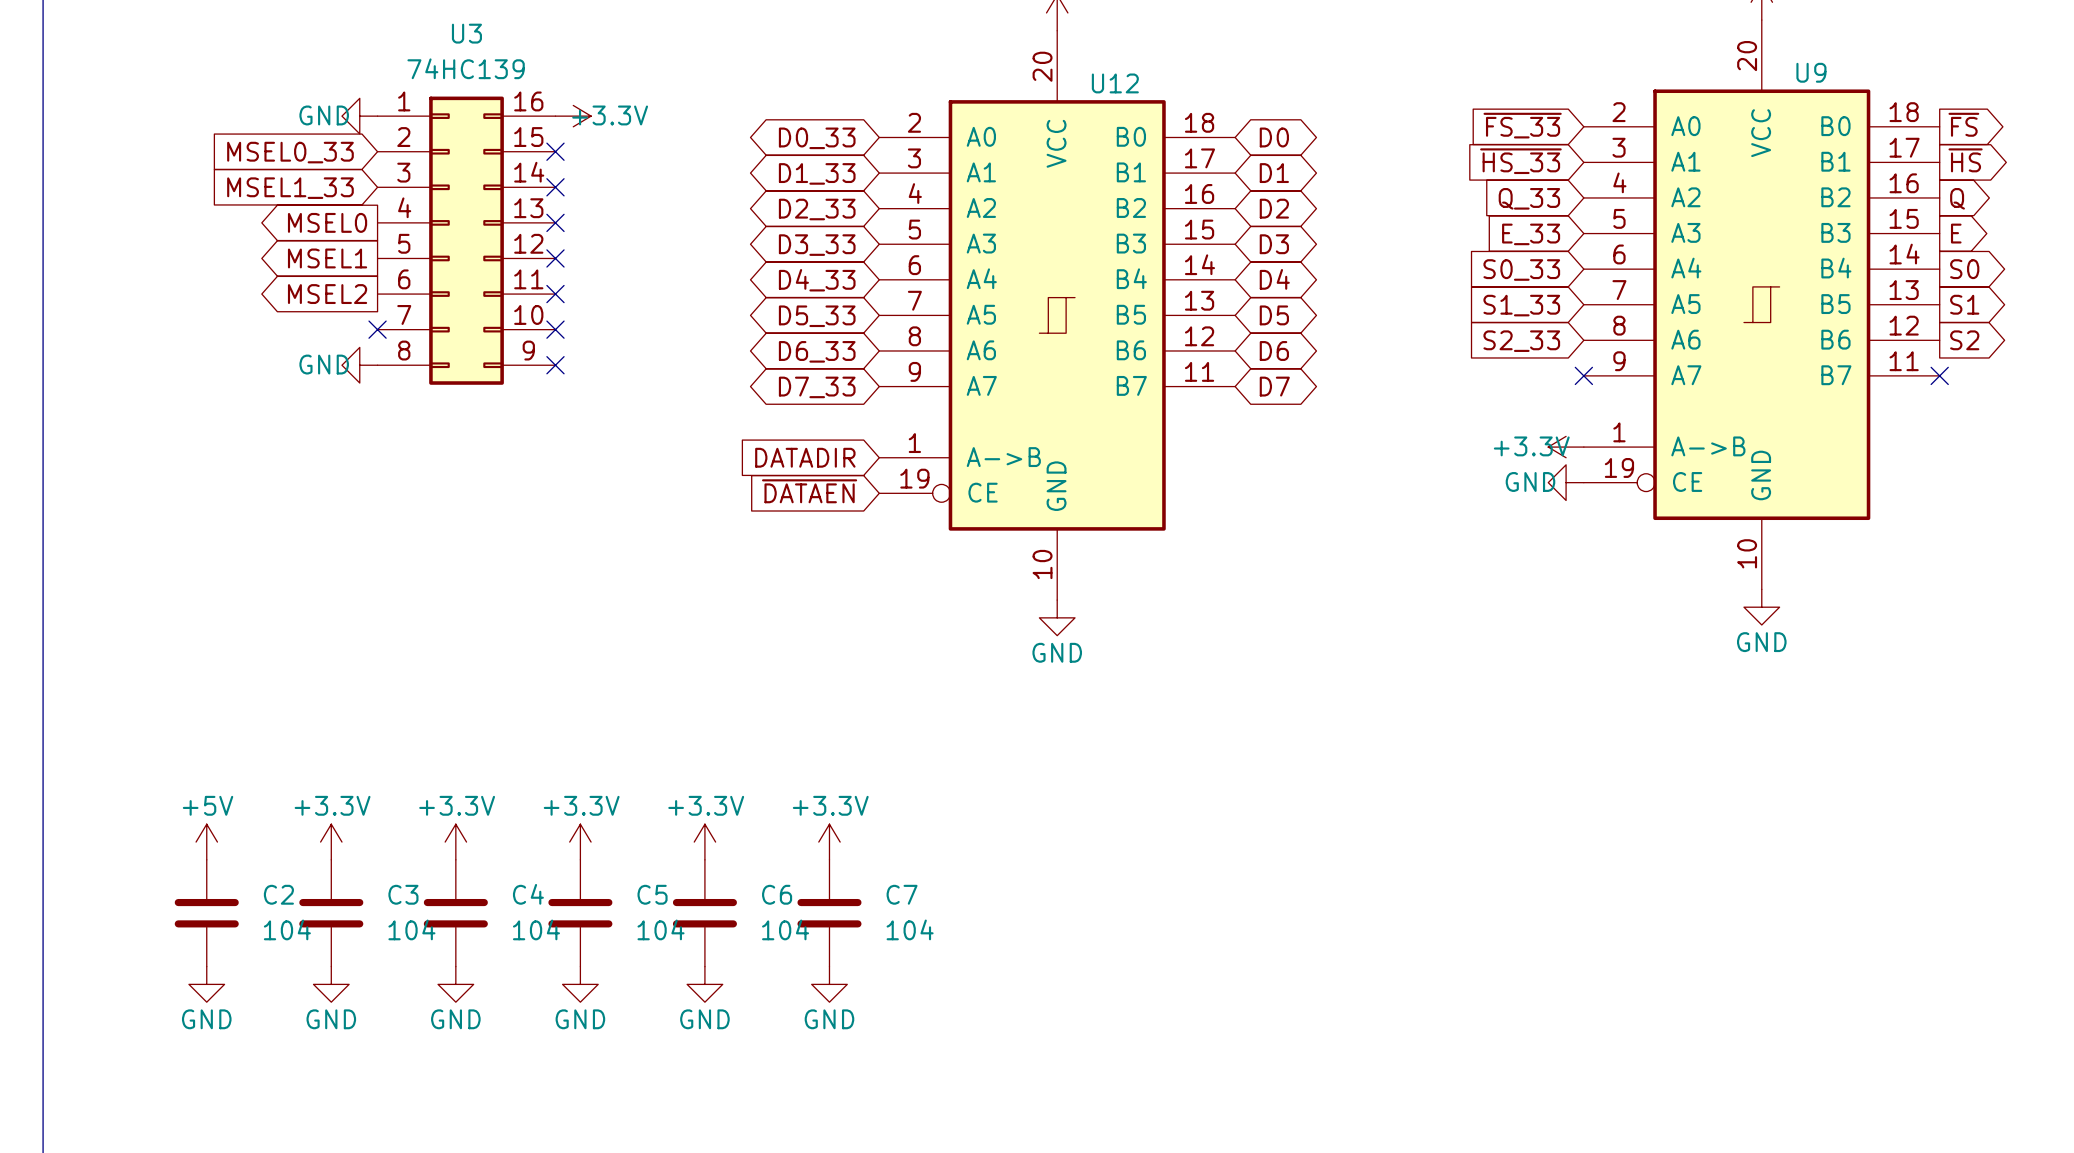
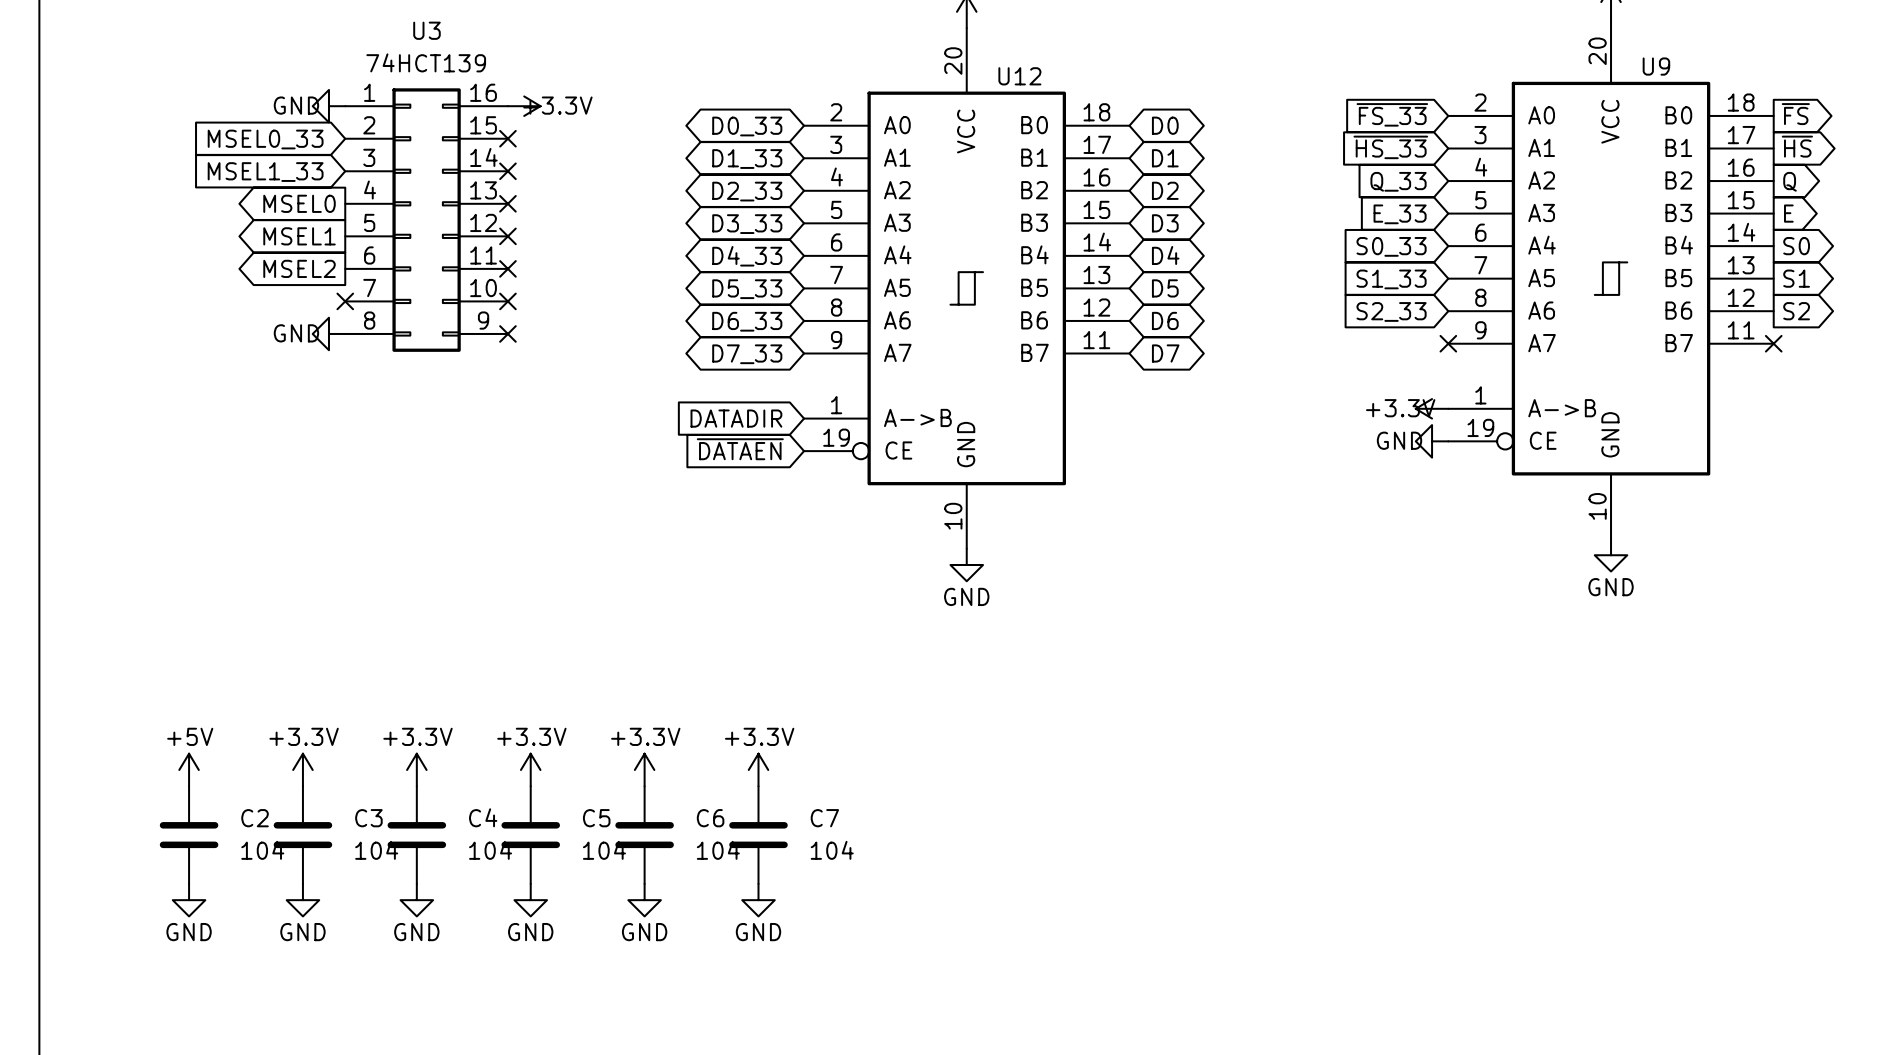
U3 value: 74HC139 (466, 68) -> 74HCT139 (426, 62)

